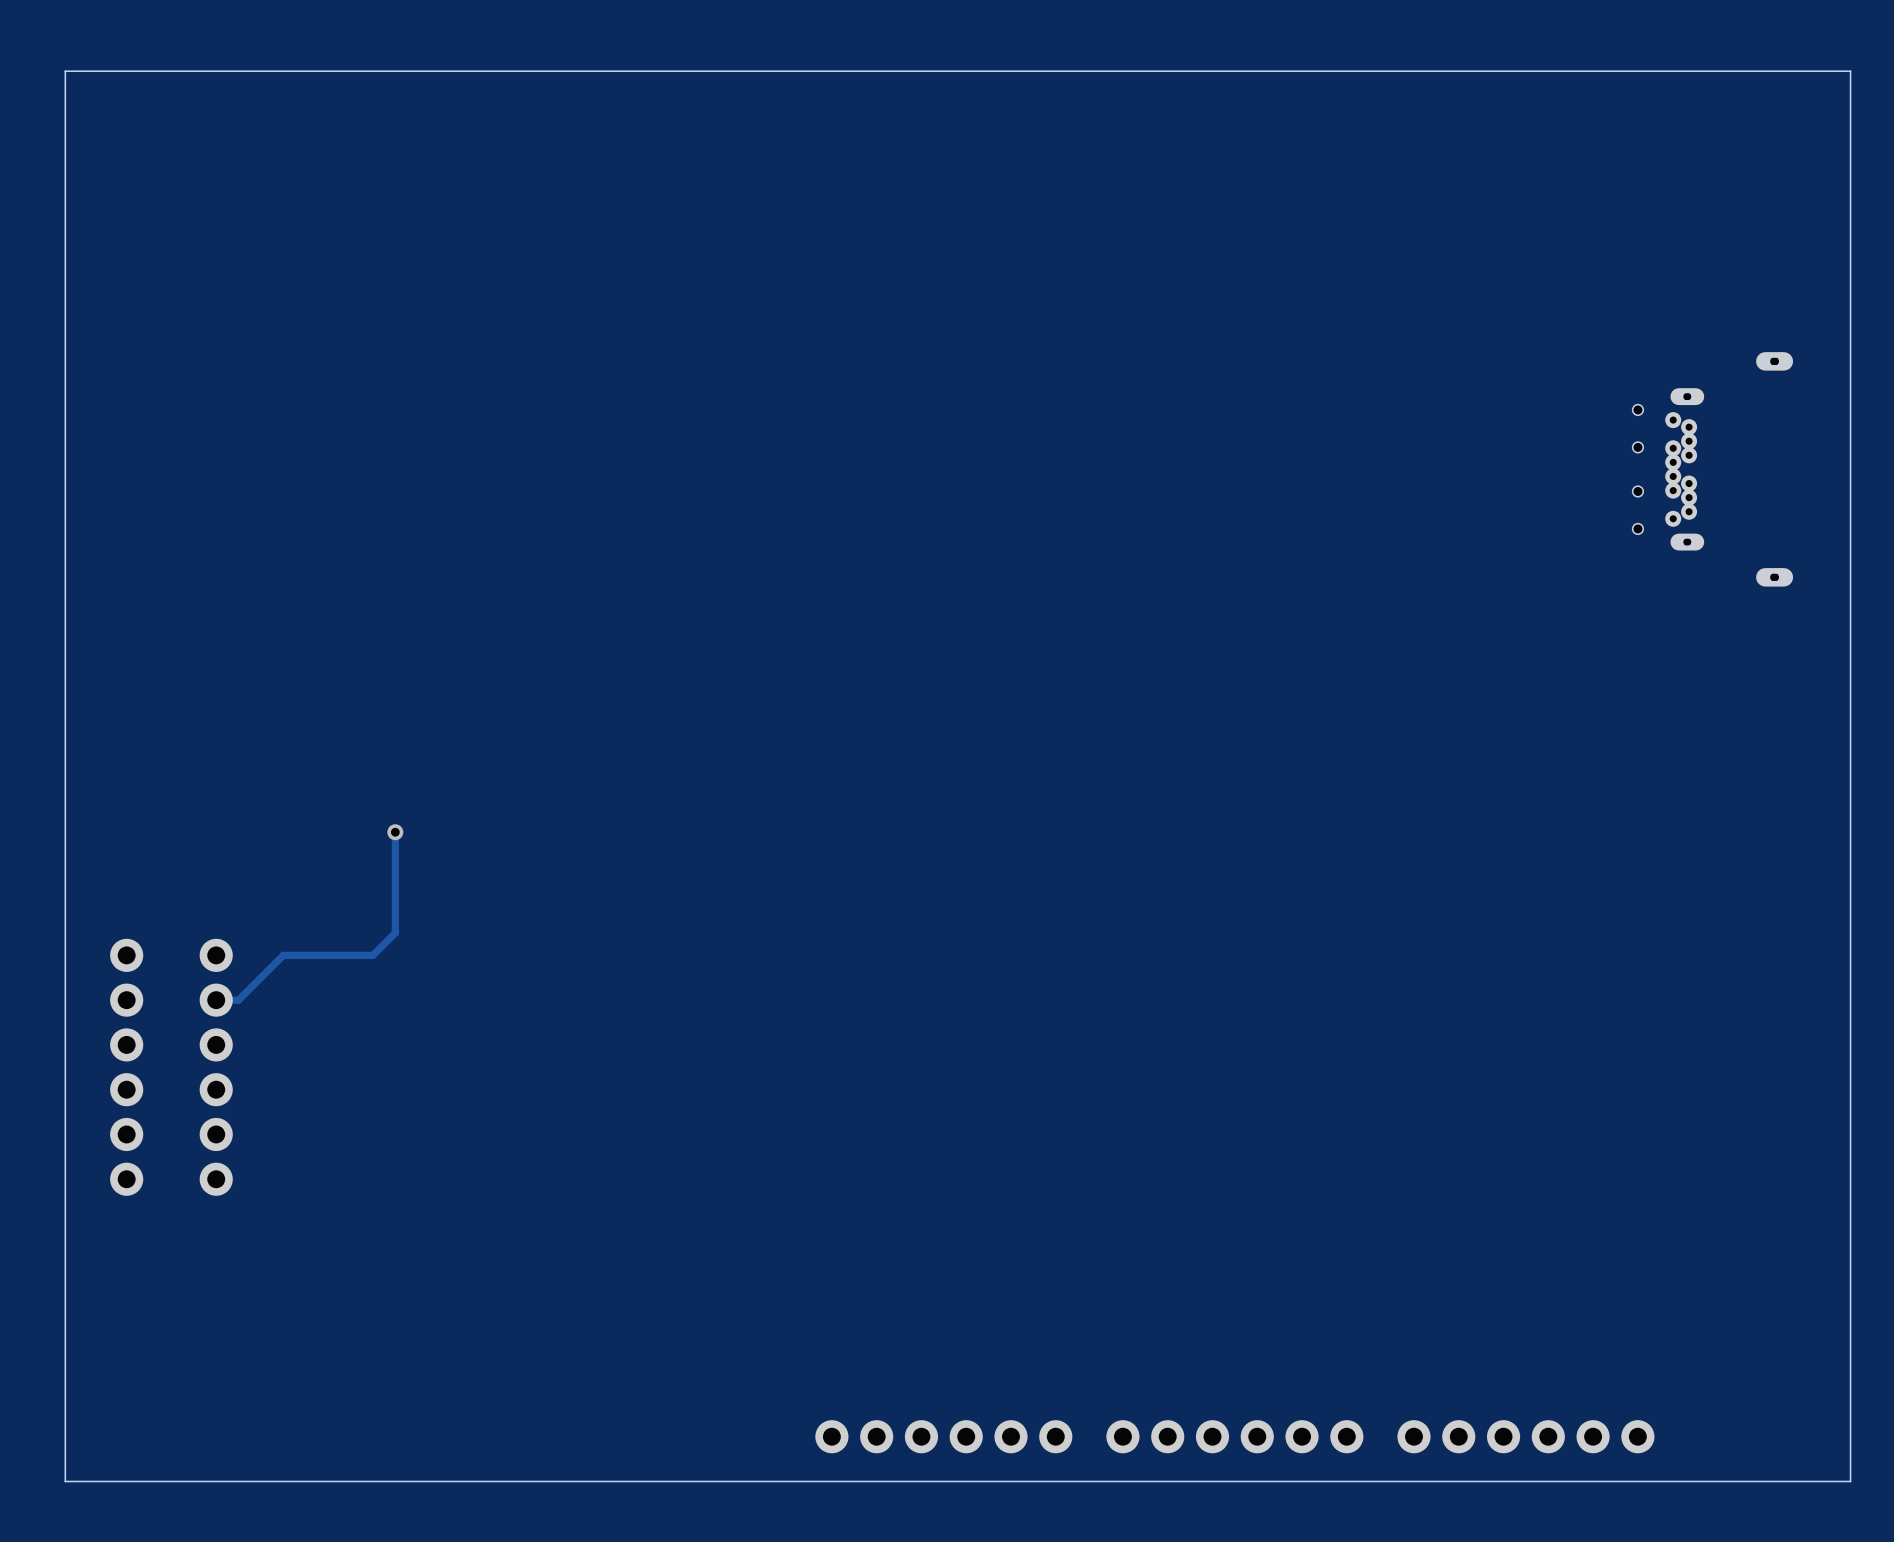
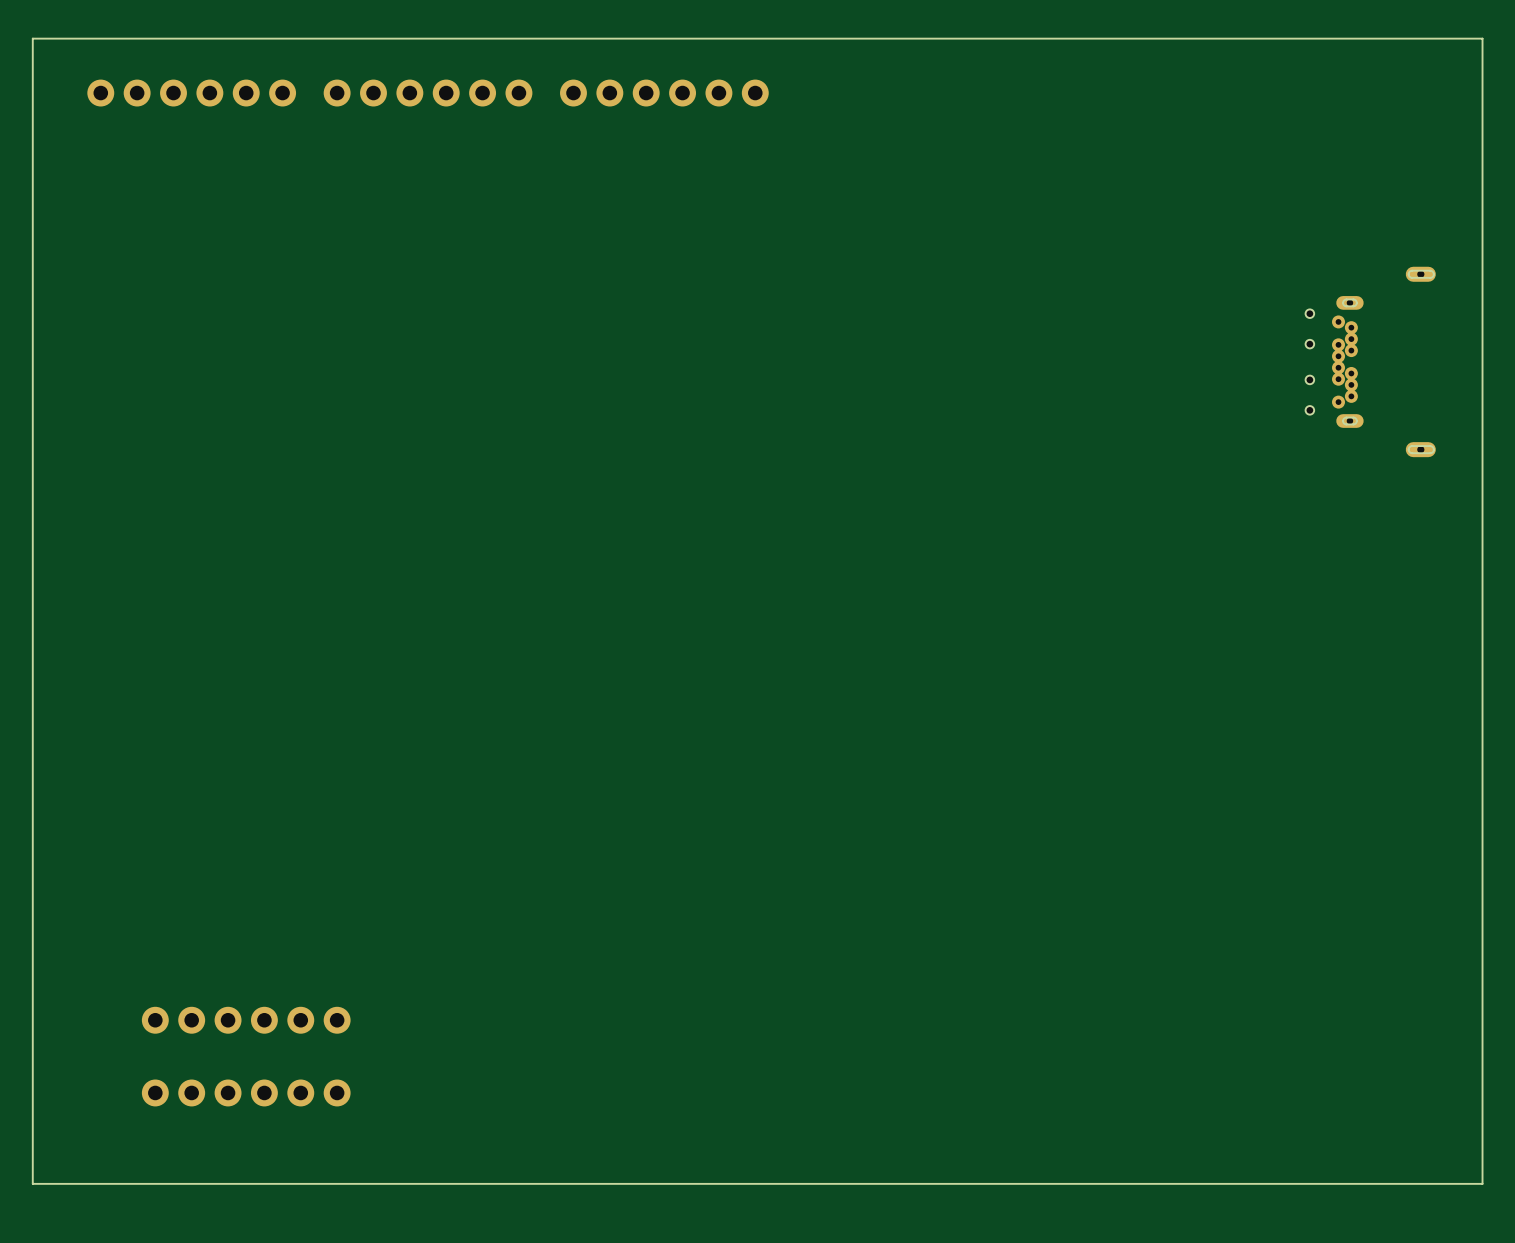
part: none -> (191, 93)
part: none -> (428, 93)
part: none -> (664, 93)
track: (395, 832) (395, 932) (372, 955) (283, 955) (238, 1000) (216, 1000) -> none
via: (395, 832) -> none
part: (126, 1067) -> none
part: (216, 1067) -> none
part: none -> (246, 1020)
part: none -> (246, 1092)
part: (943, 1436) -> none
part: (1234, 1436) -> none
part: (1525, 1436) -> none

